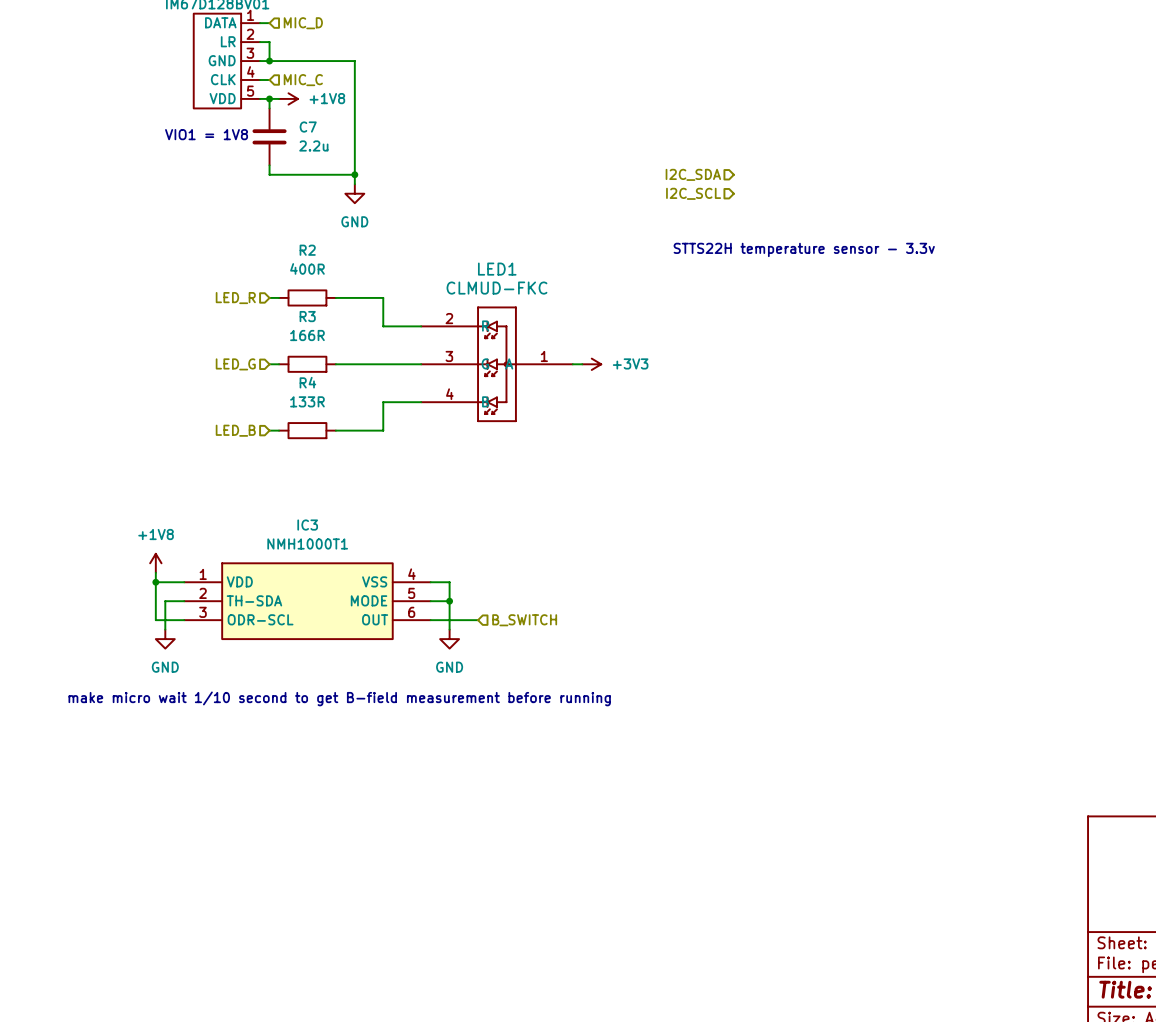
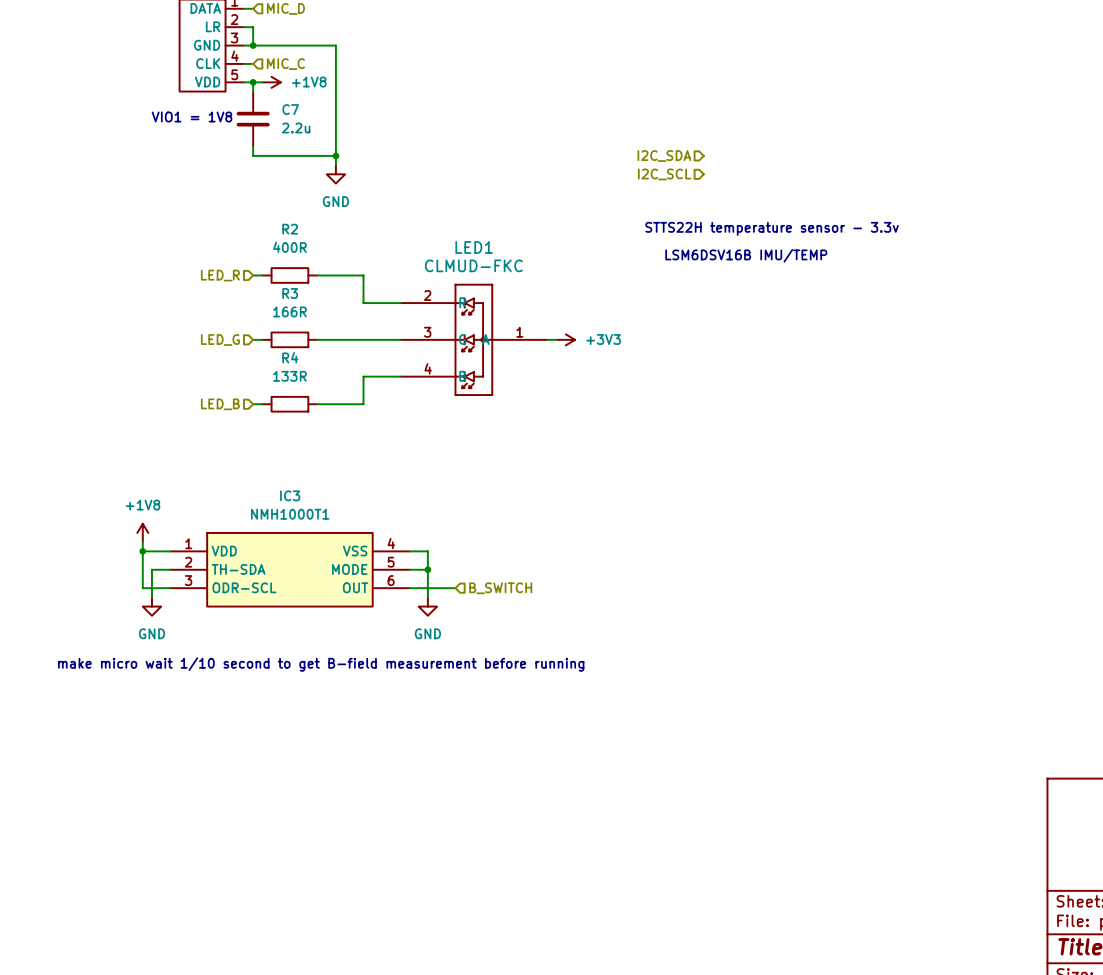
text: none -> LSM6DSV16B IMU/TEMP (746, 255)

